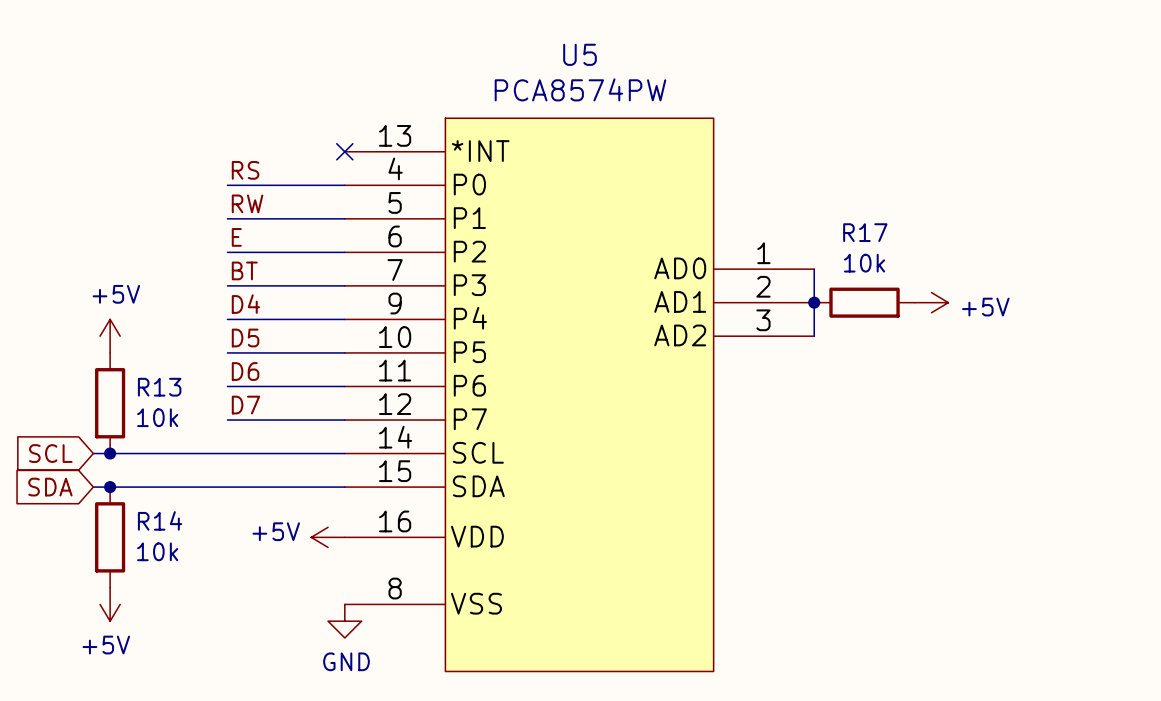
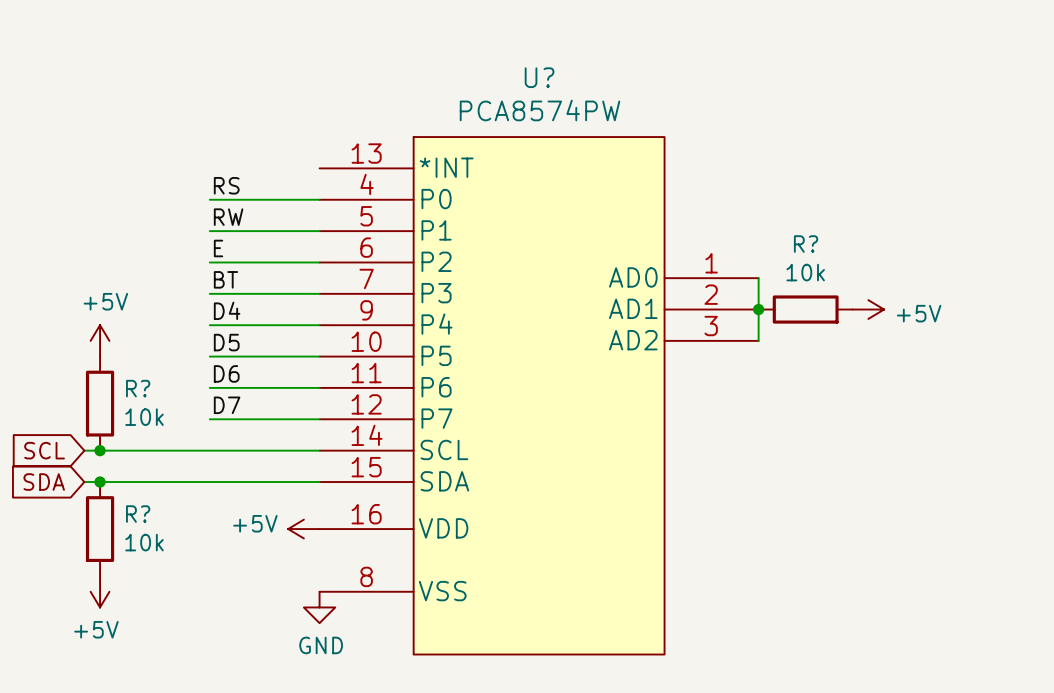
U5 name: U5 (580, 54) -> U? (539, 77)
no-connect mark: (344, 151) -> none
R17 name: R17 (865, 232) -> R? (806, 244)
R13 name: R13 (159, 387) -> R? (138, 388)
R14 name: R14 (160, 520) -> R? (138, 514)

